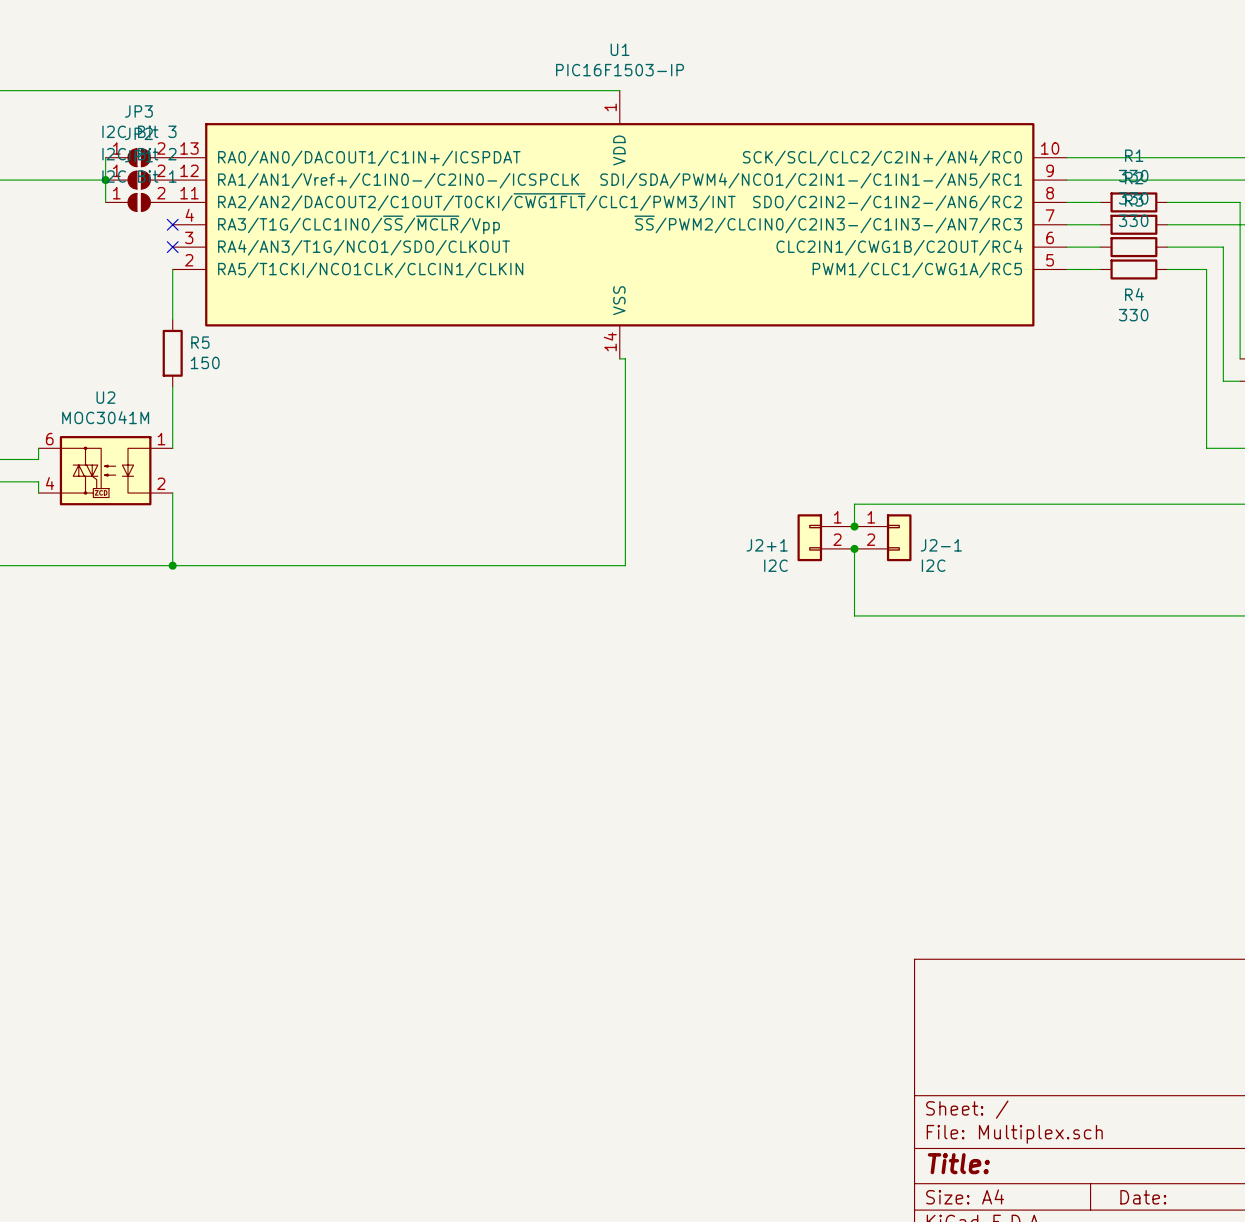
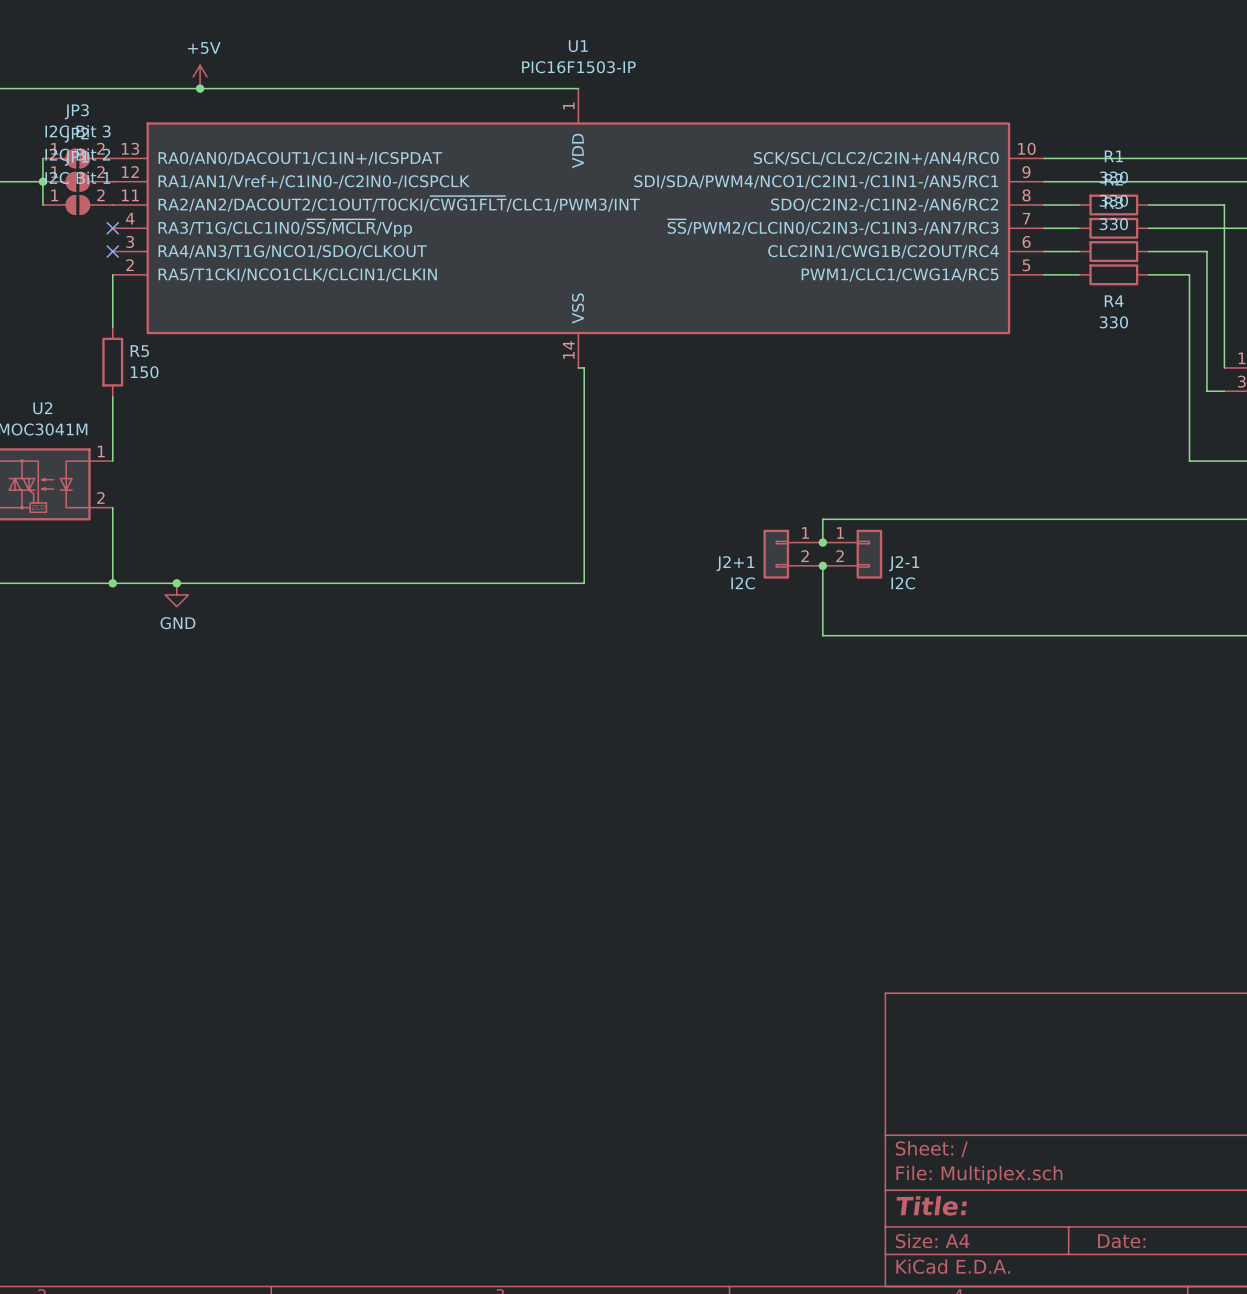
power symbol: none -> +5V (200, 76)
junction: none -> (200, 88)
junction: none -> (176, 583)
power symbol: none -> GND (176, 594)

